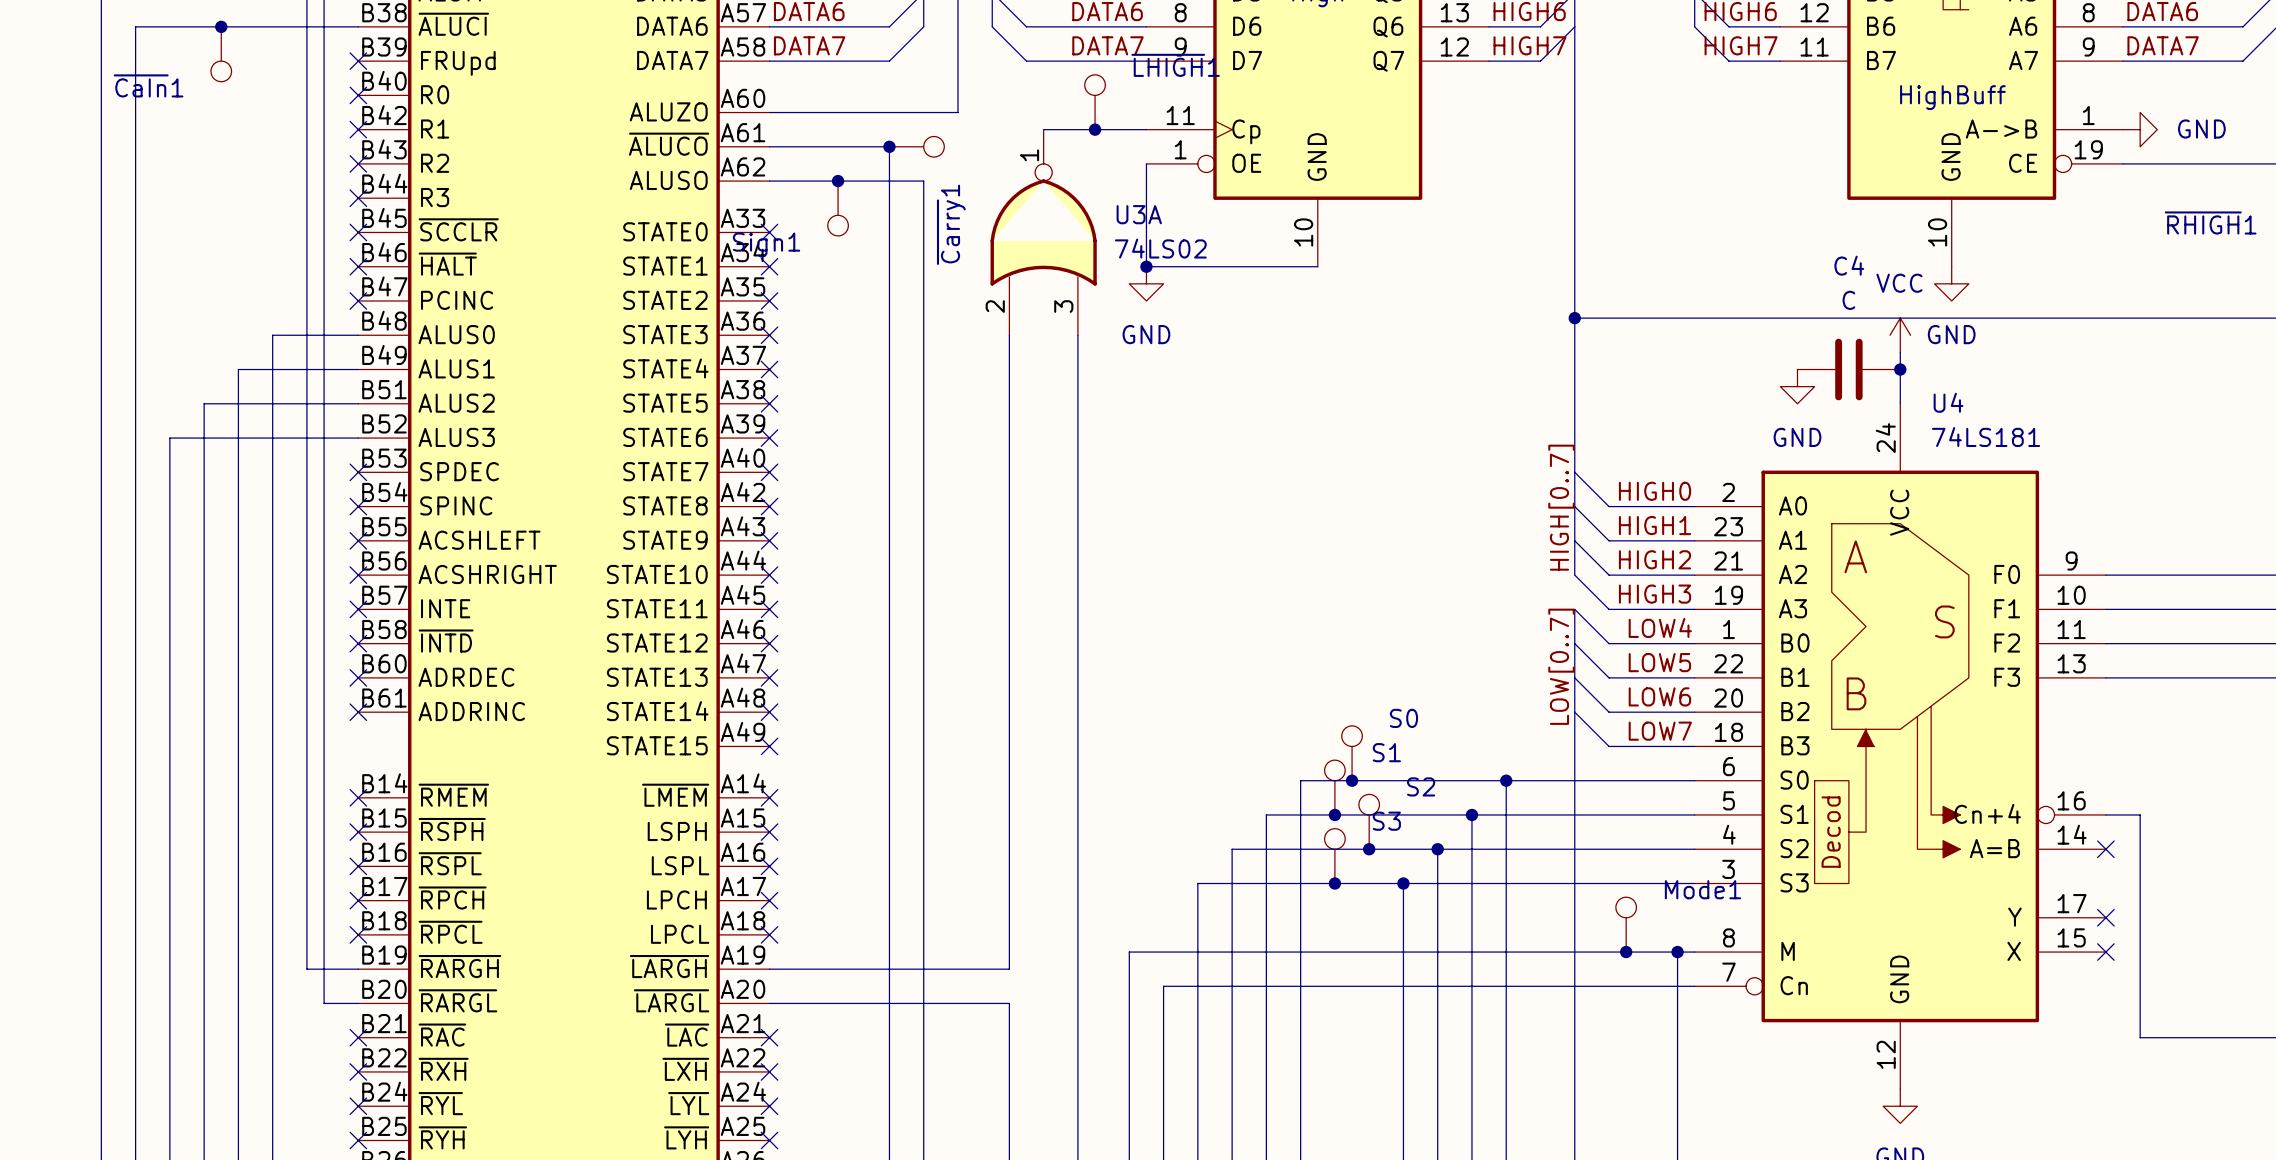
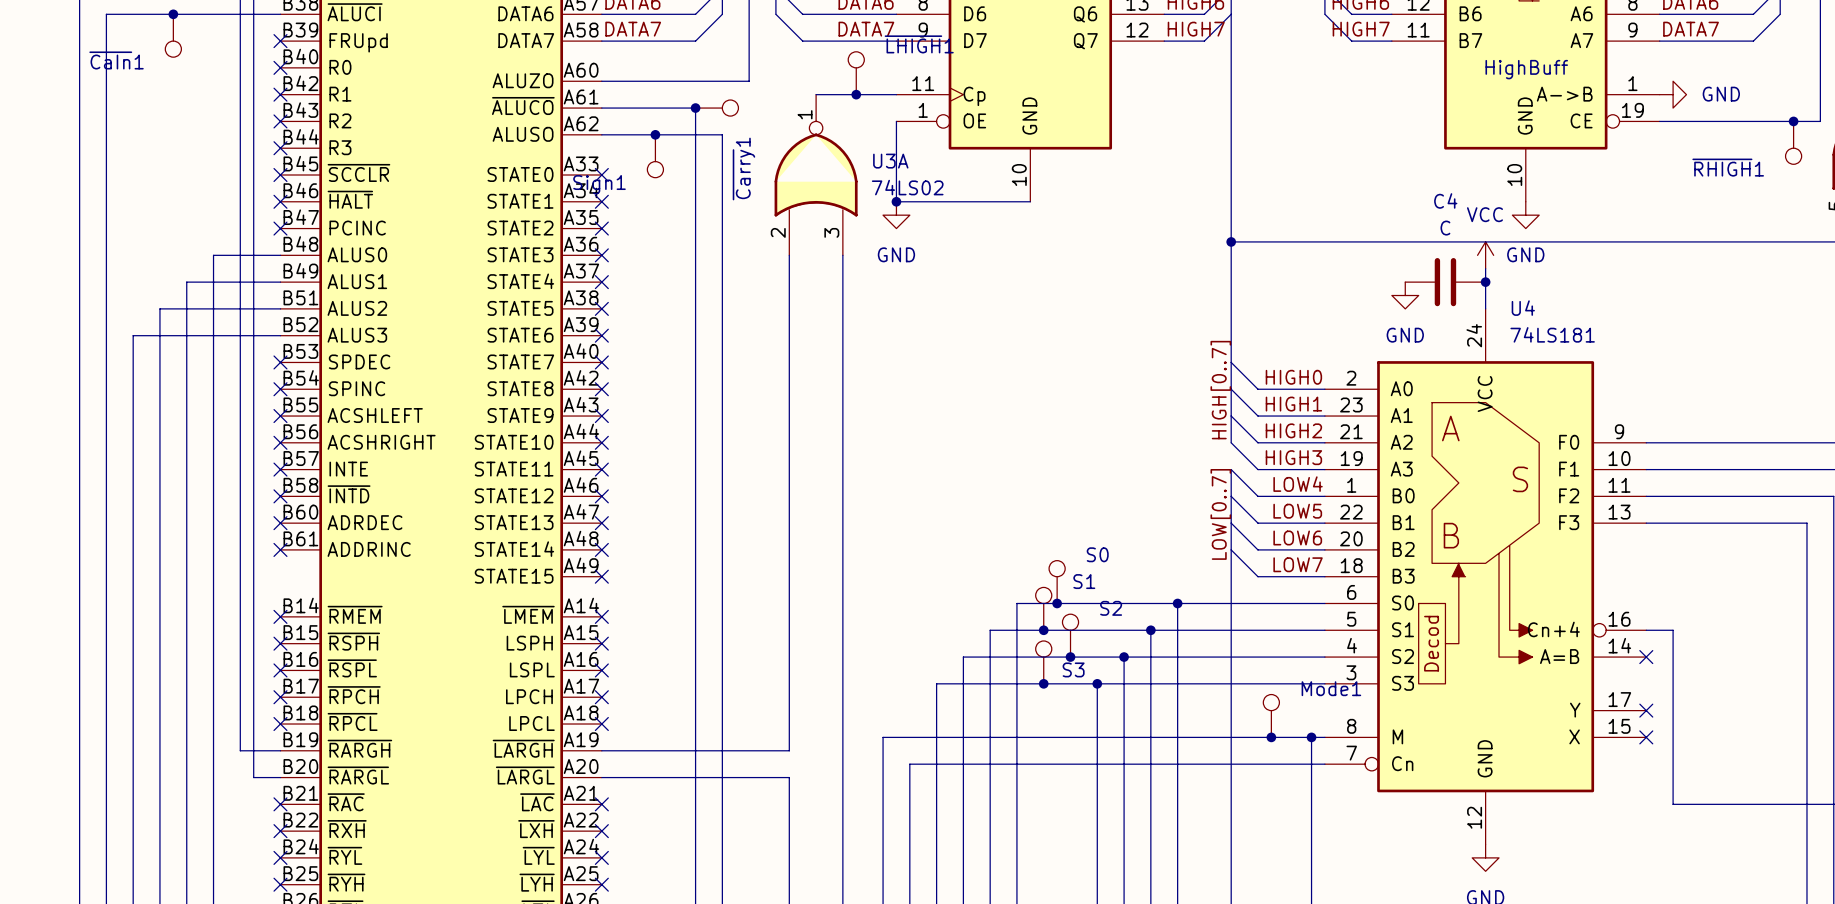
S3 name position: S3 (1386, 821) -> S3 (1073, 669)

